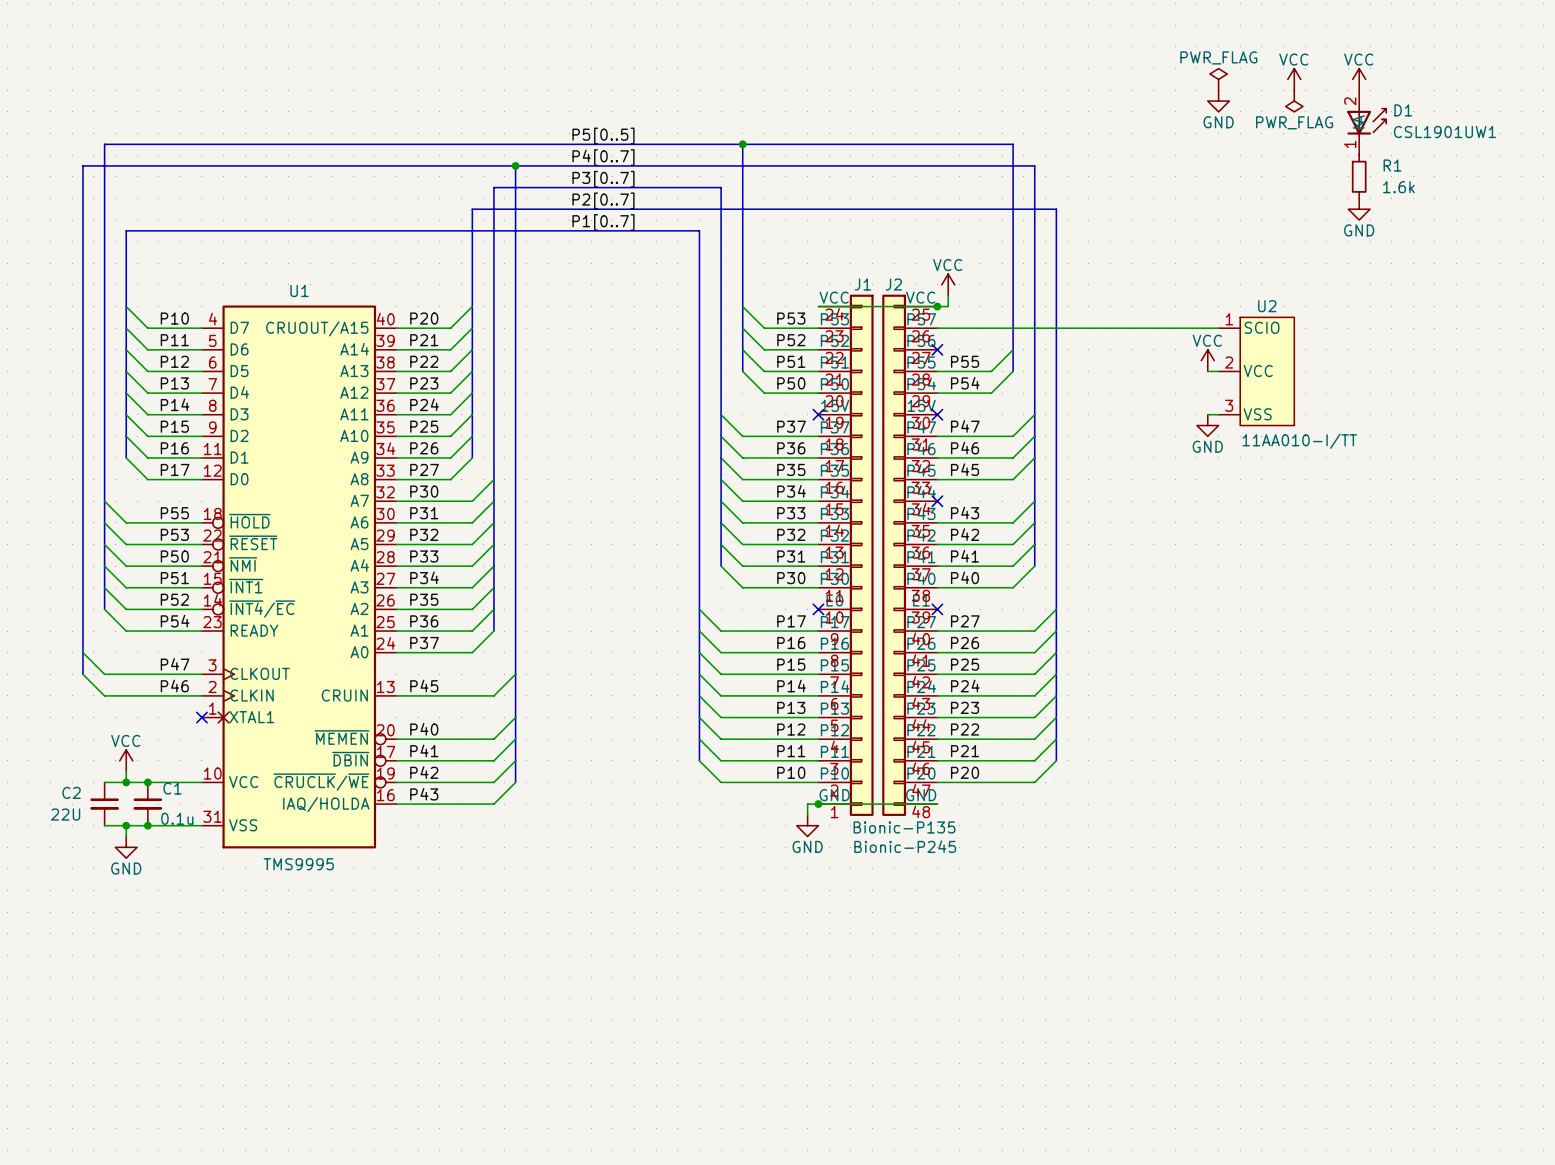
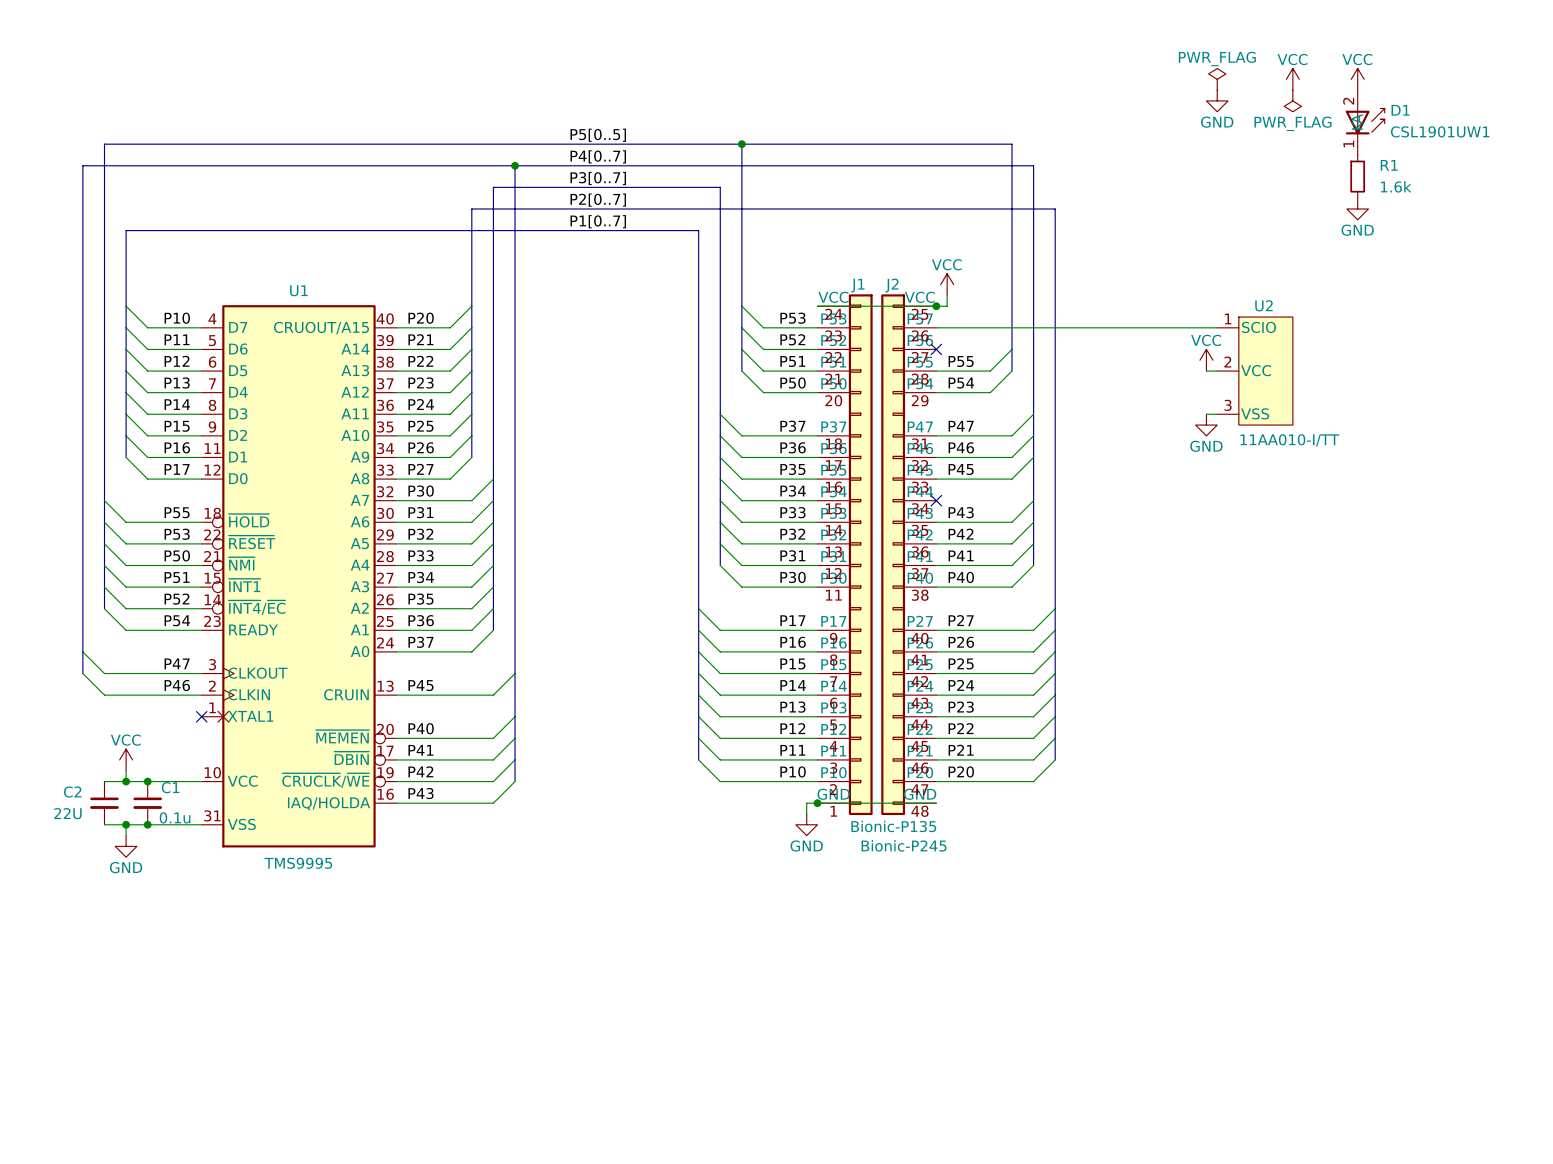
J1 symbol: [818, 294, 874, 816] -> [817, 294, 873, 816]
J2 symbol: [882, 294, 938, 816] -> [881, 294, 937, 816]
no-connect mark: (818, 414) -> none
no-connect mark: (937, 414) -> none
no-connect mark: (818, 609) -> none
no-connect mark: (937, 609) -> none

